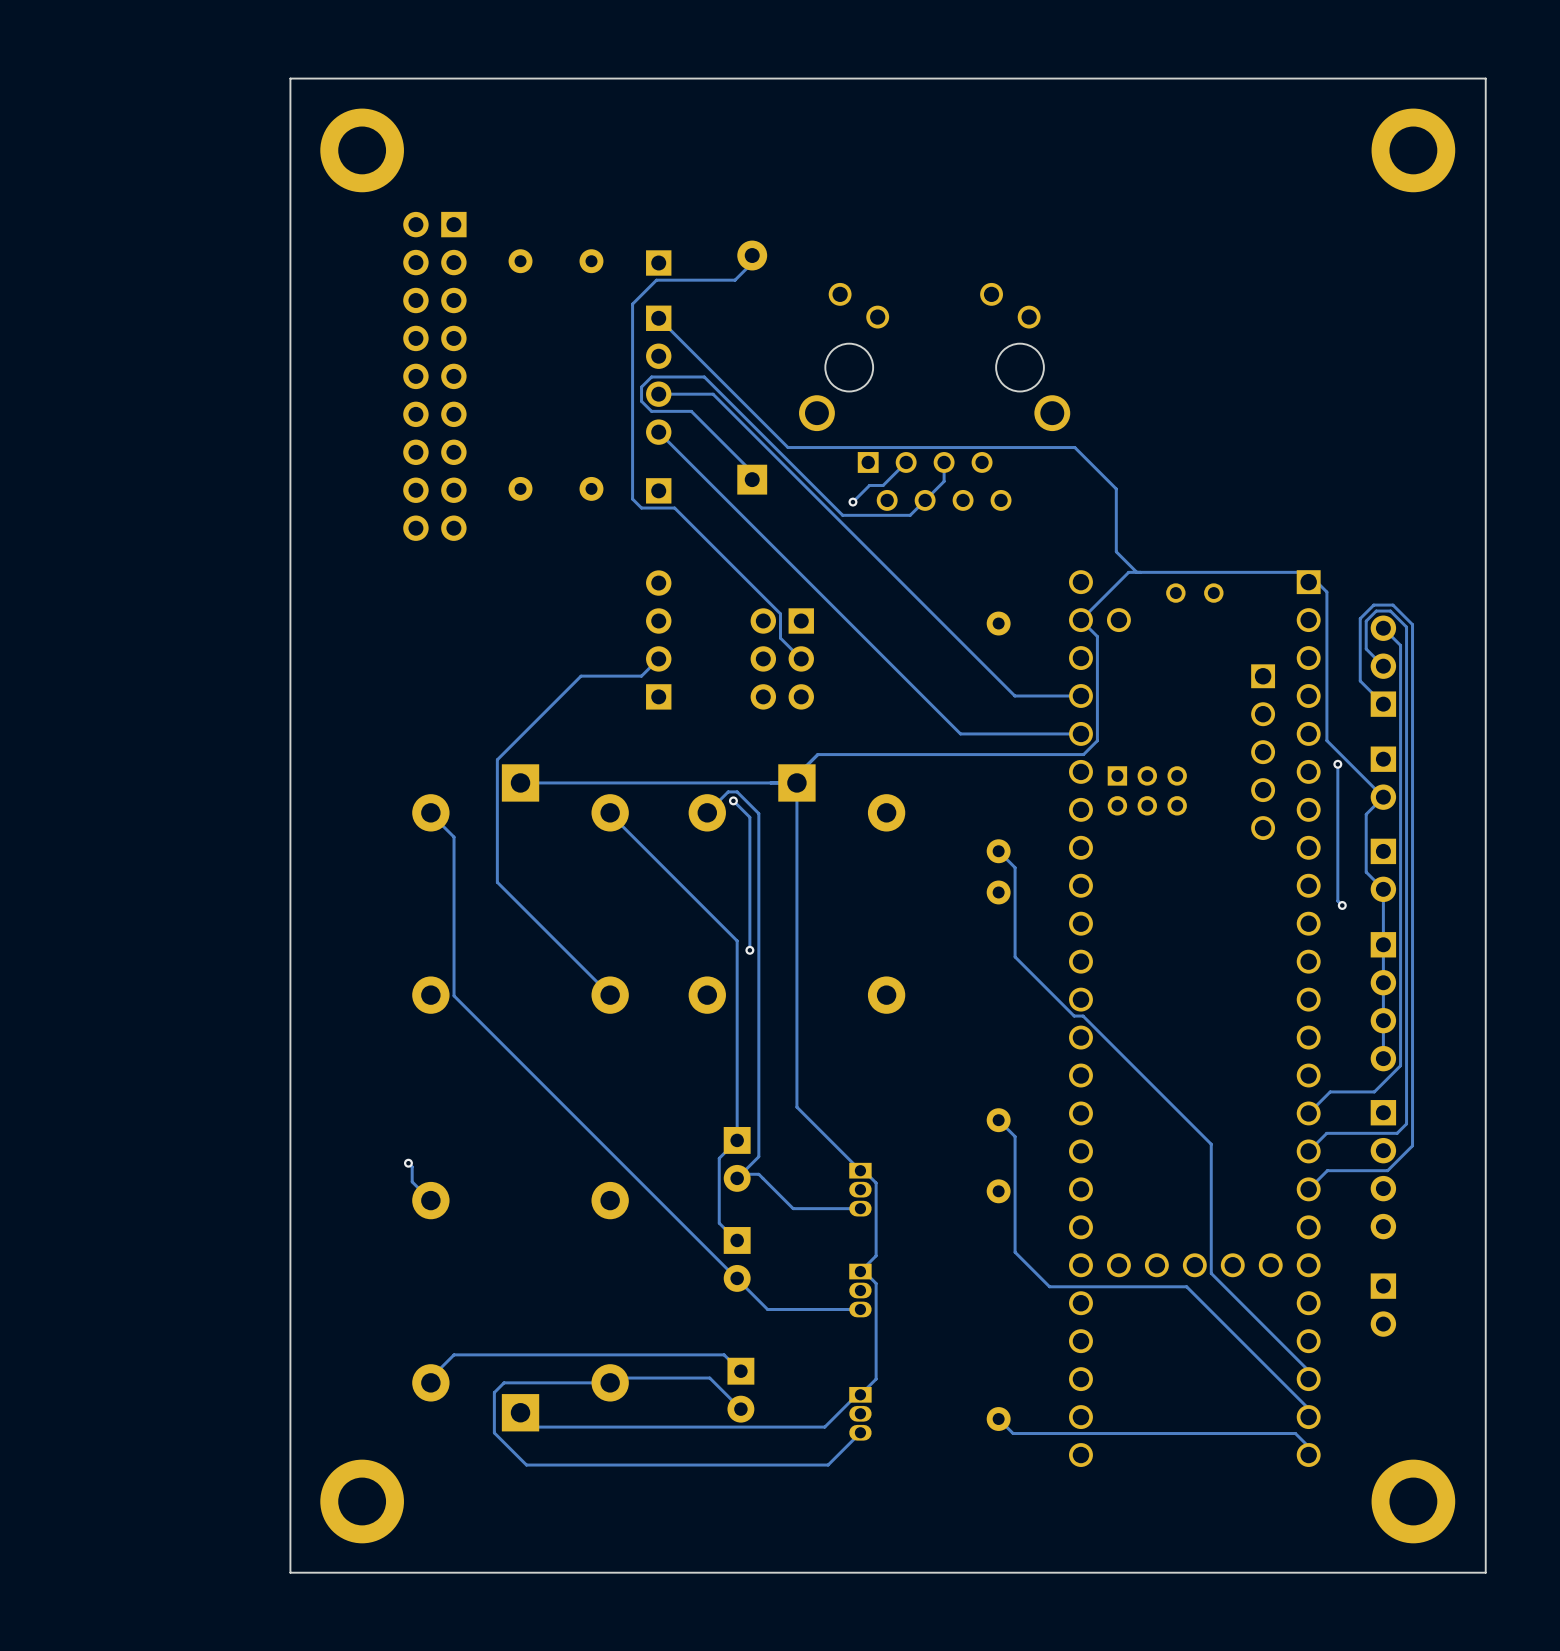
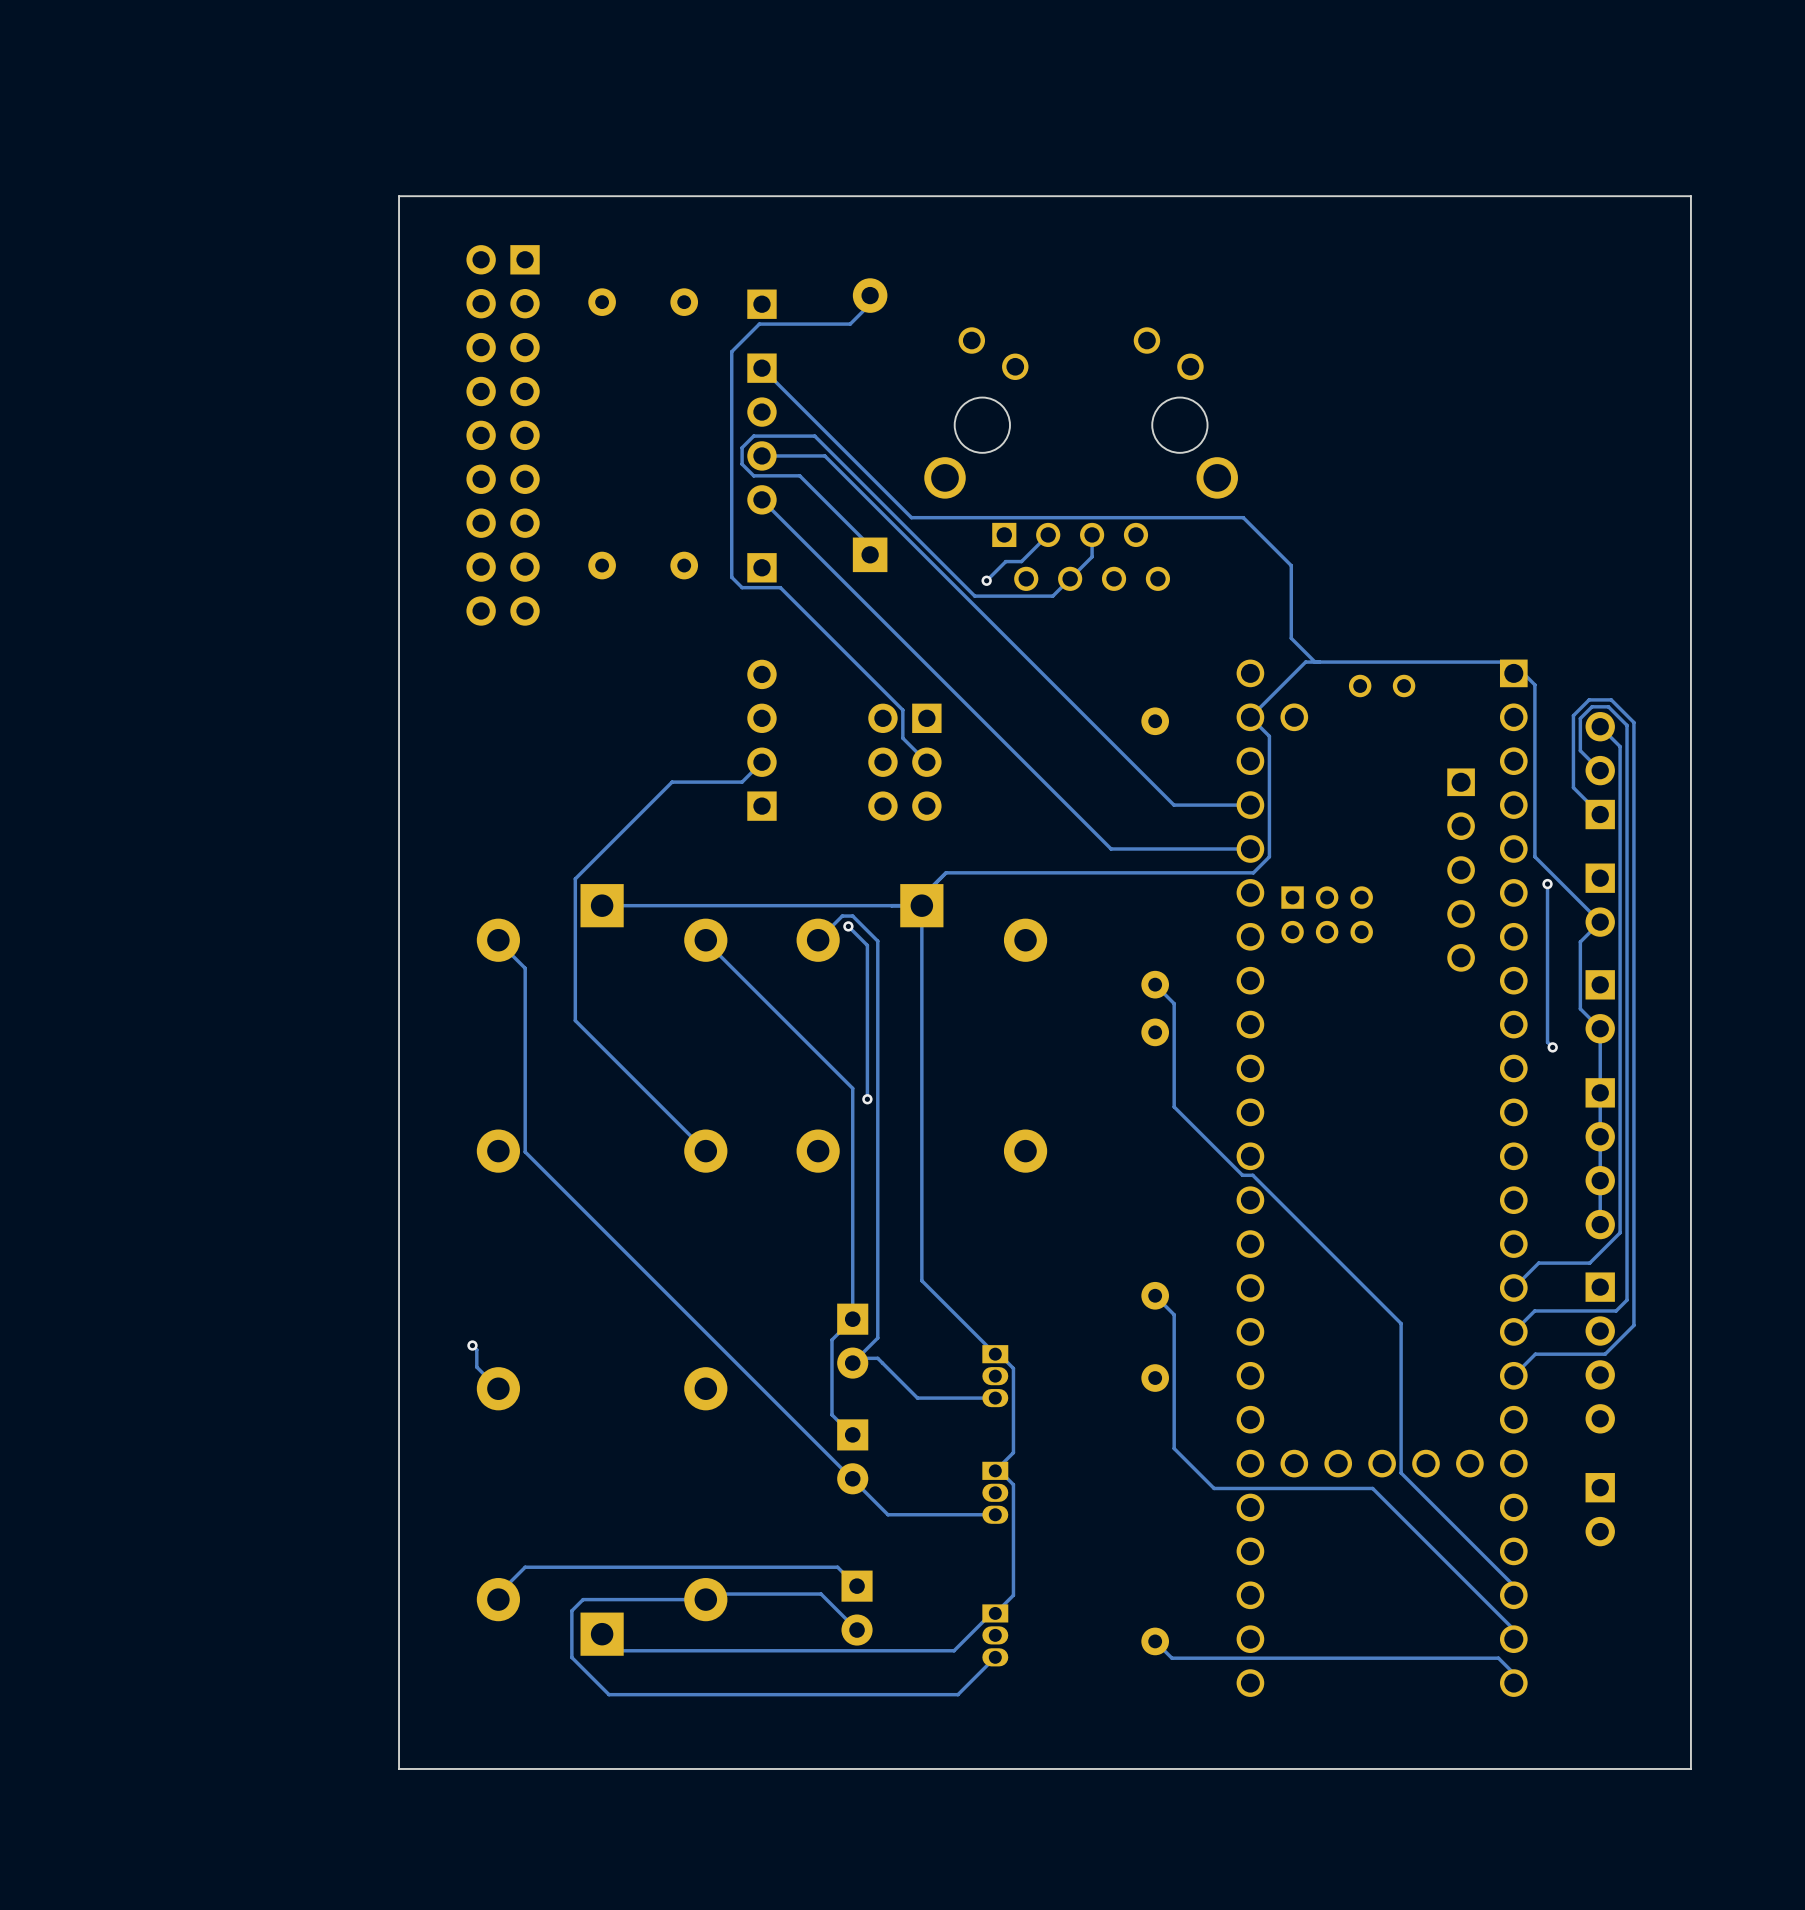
board edge: (1485, 78) (290, 78) (290, 1572) (1485, 1572) (1485, 78) -> (1690, 196) (1690, 1768) (399, 1768) (399, 196) (1690, 196)
part: (362, 150) -> none
part: (1413, 150) -> none
part: (362, 1501) -> none
part: (1413, 1501) -> none

